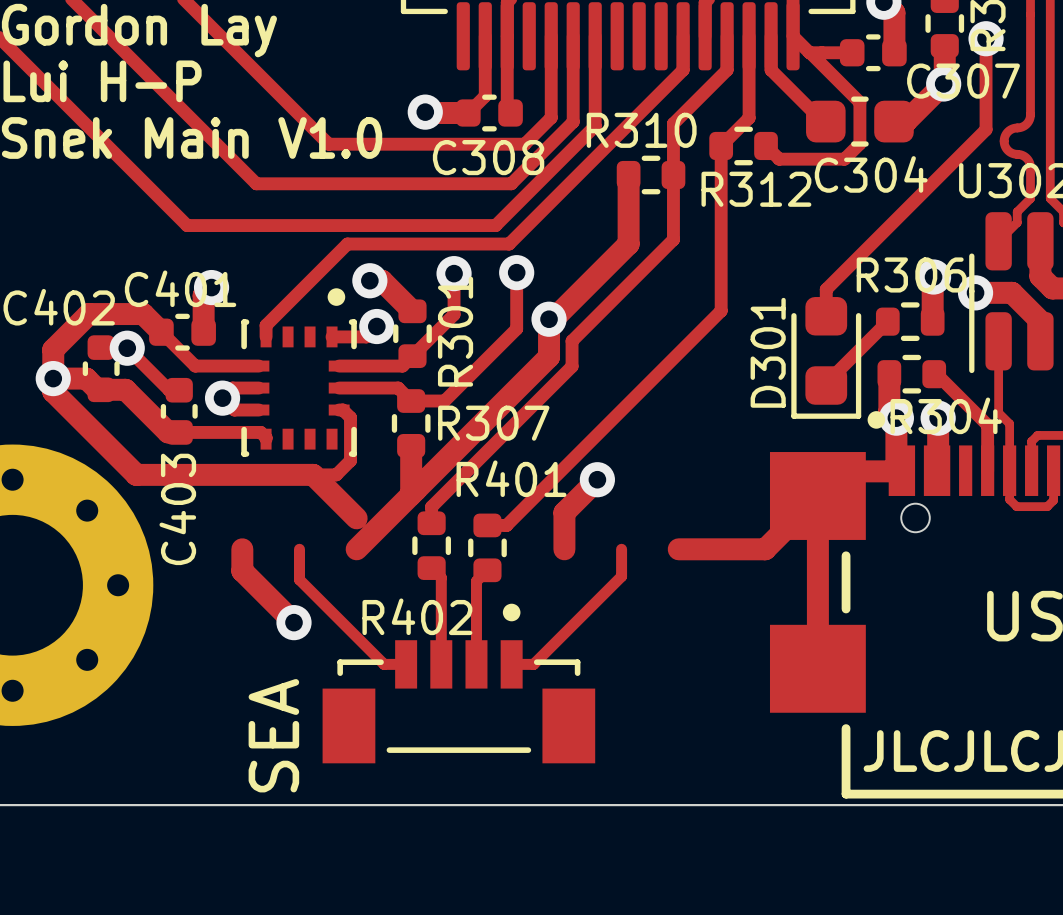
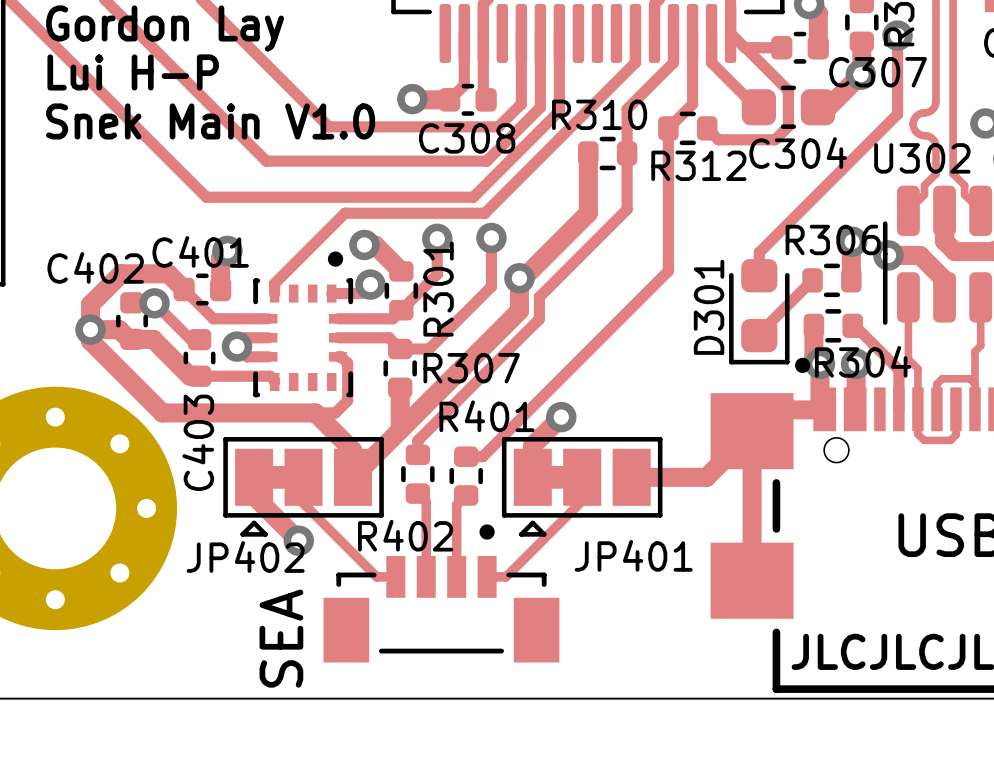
JP402: none -> (303, 486)
JP401: none -> (582, 486)

